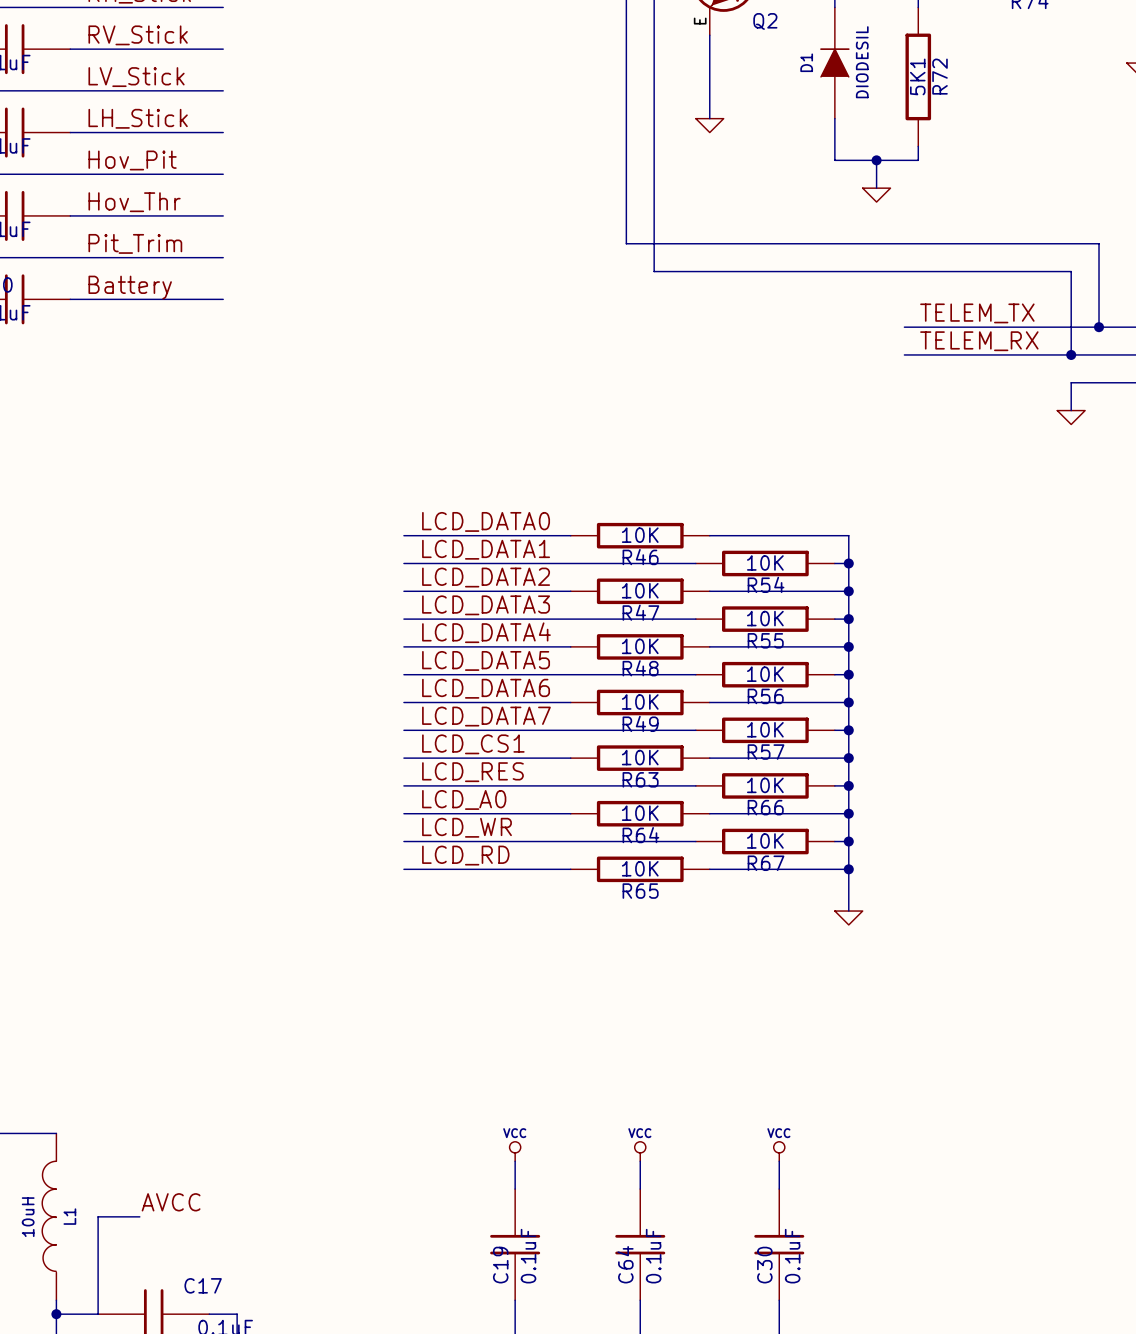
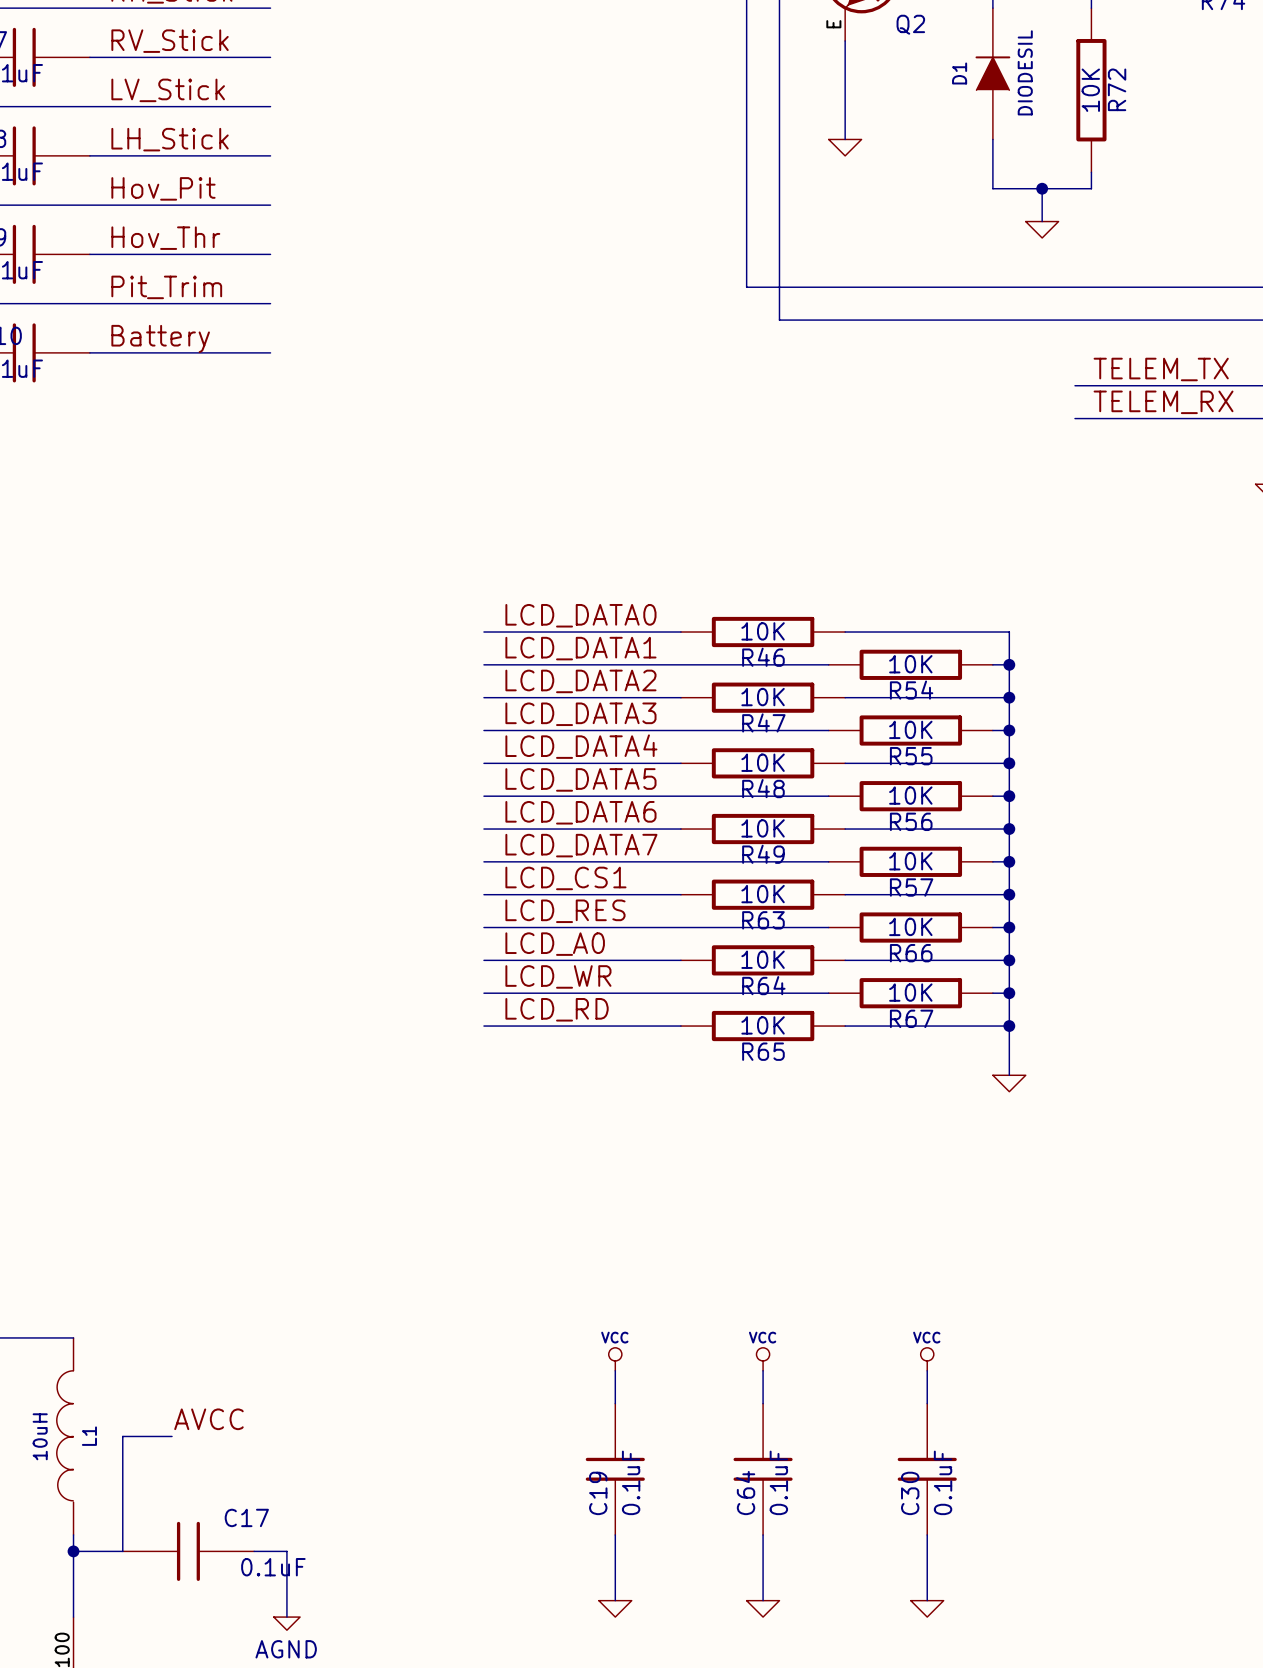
R72 value: 5K1 (917, 76) -> 10K (1090, 90)

